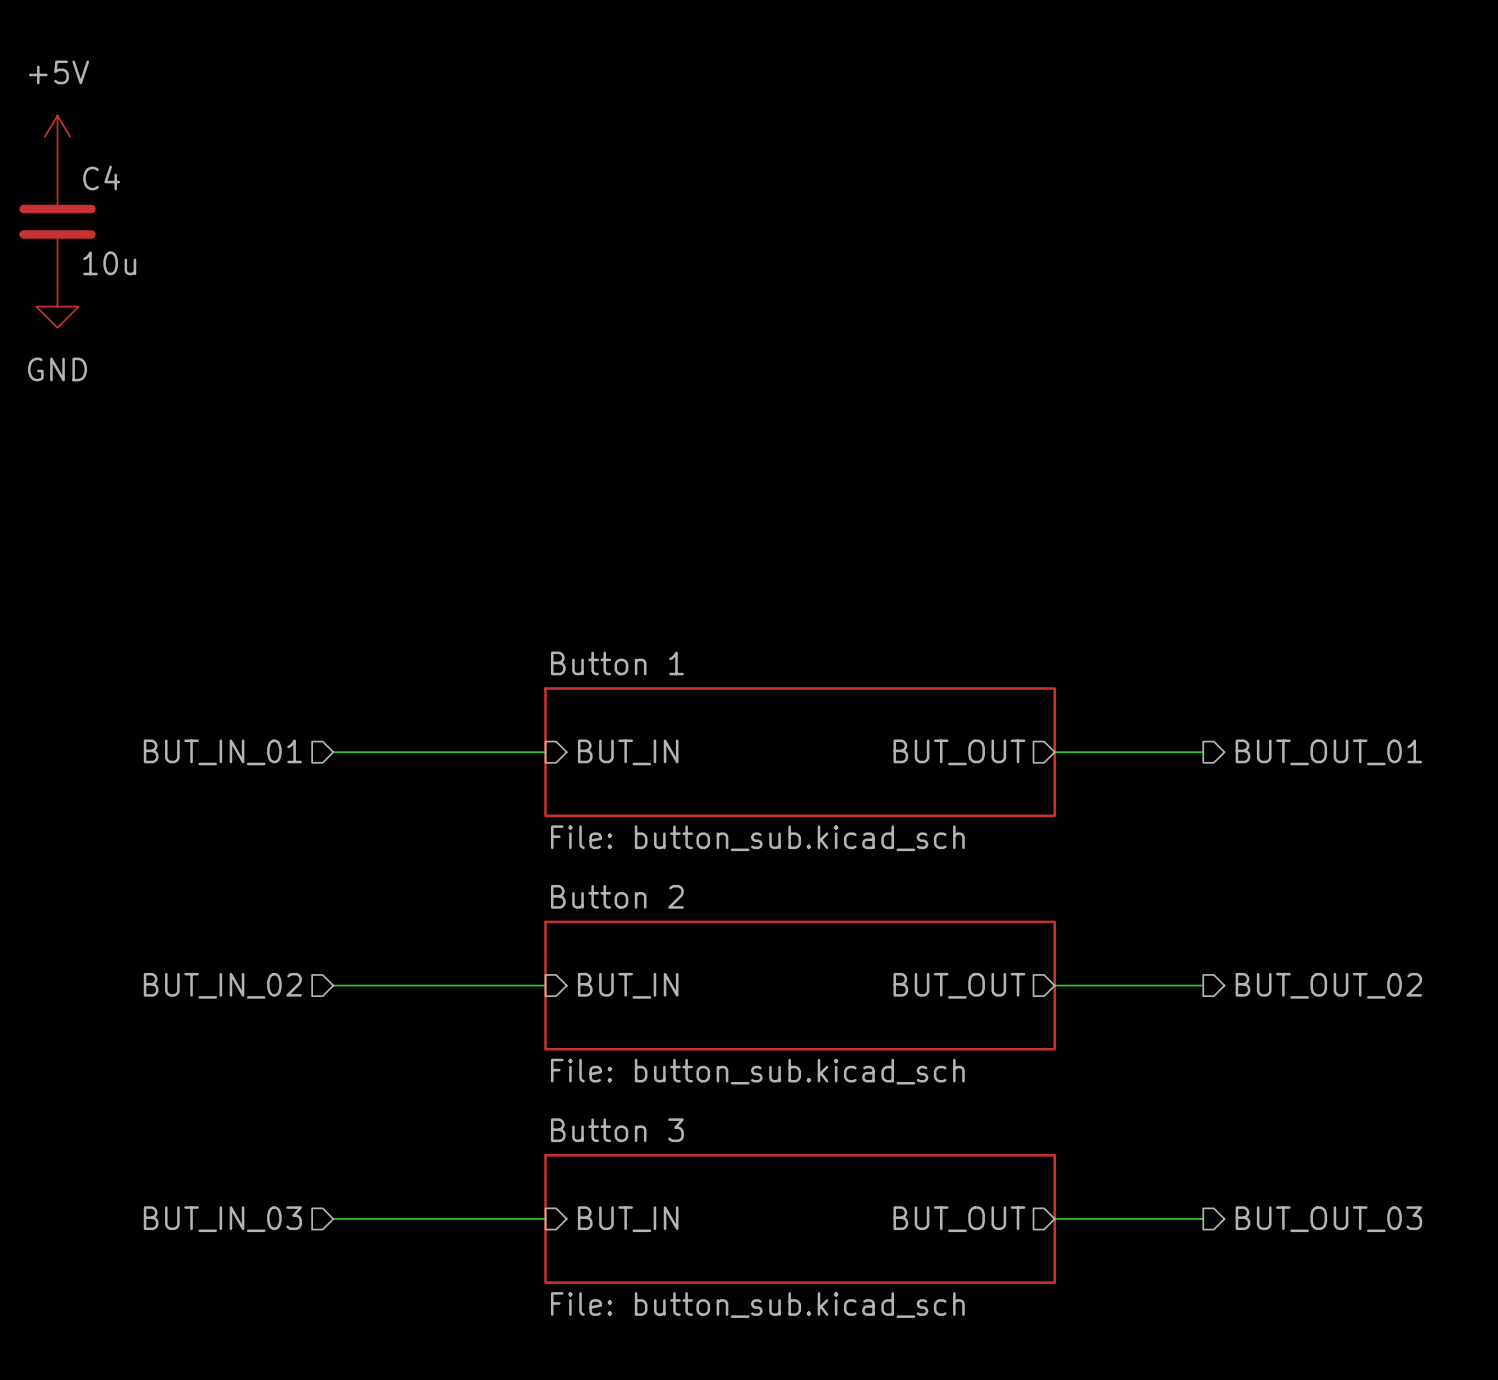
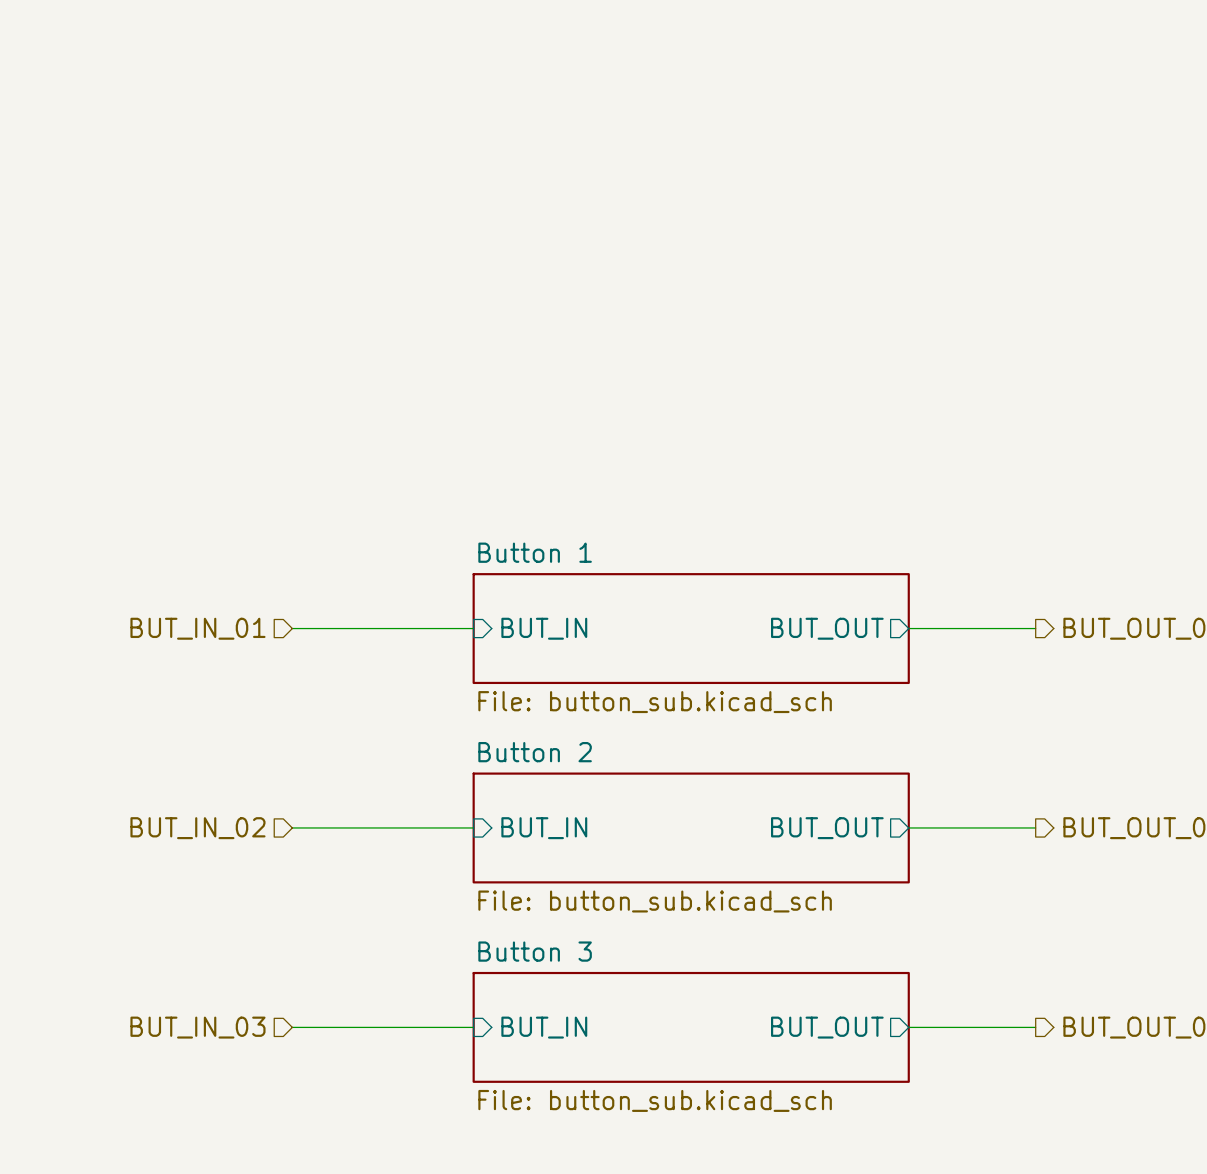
power symbol: +5V (57, 136) -> none
C4: 10u (57, 221) -> none
power symbol: GND (57, 306) -> none

